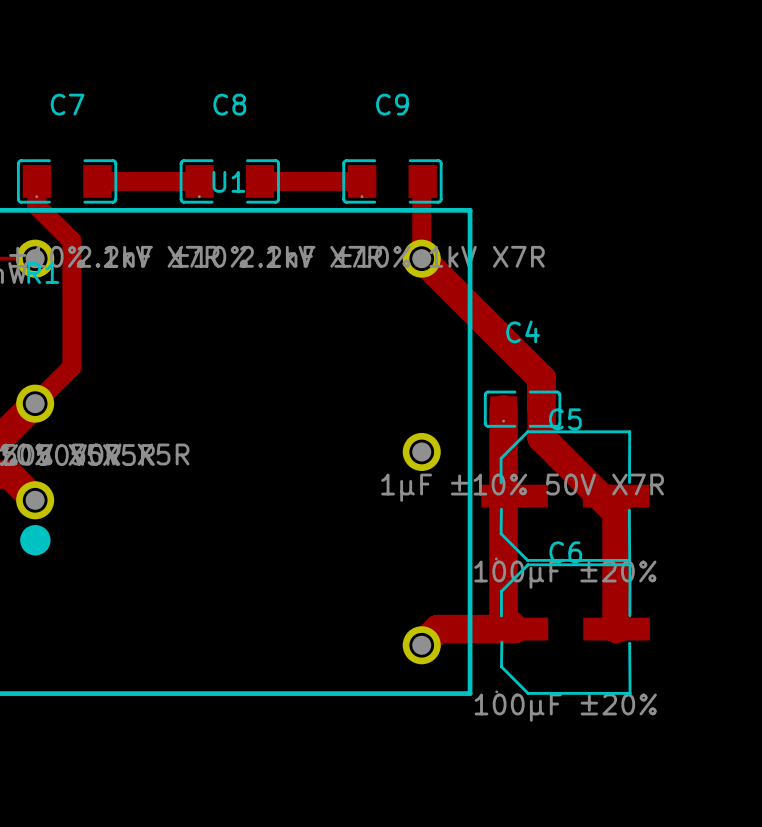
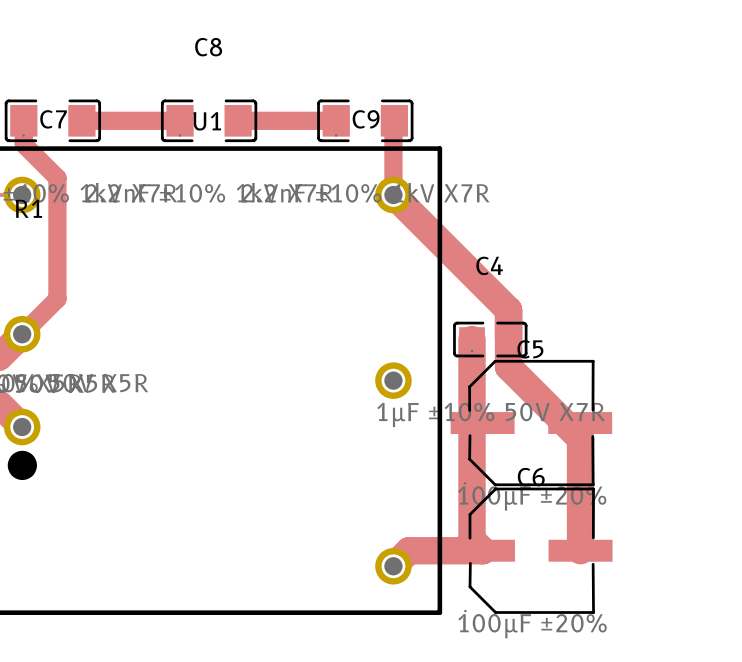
C7 name position: C7 (67, 104) -> C7 (53, 119)
C9 name position: C9 (392, 104) -> C9 (366, 119)

